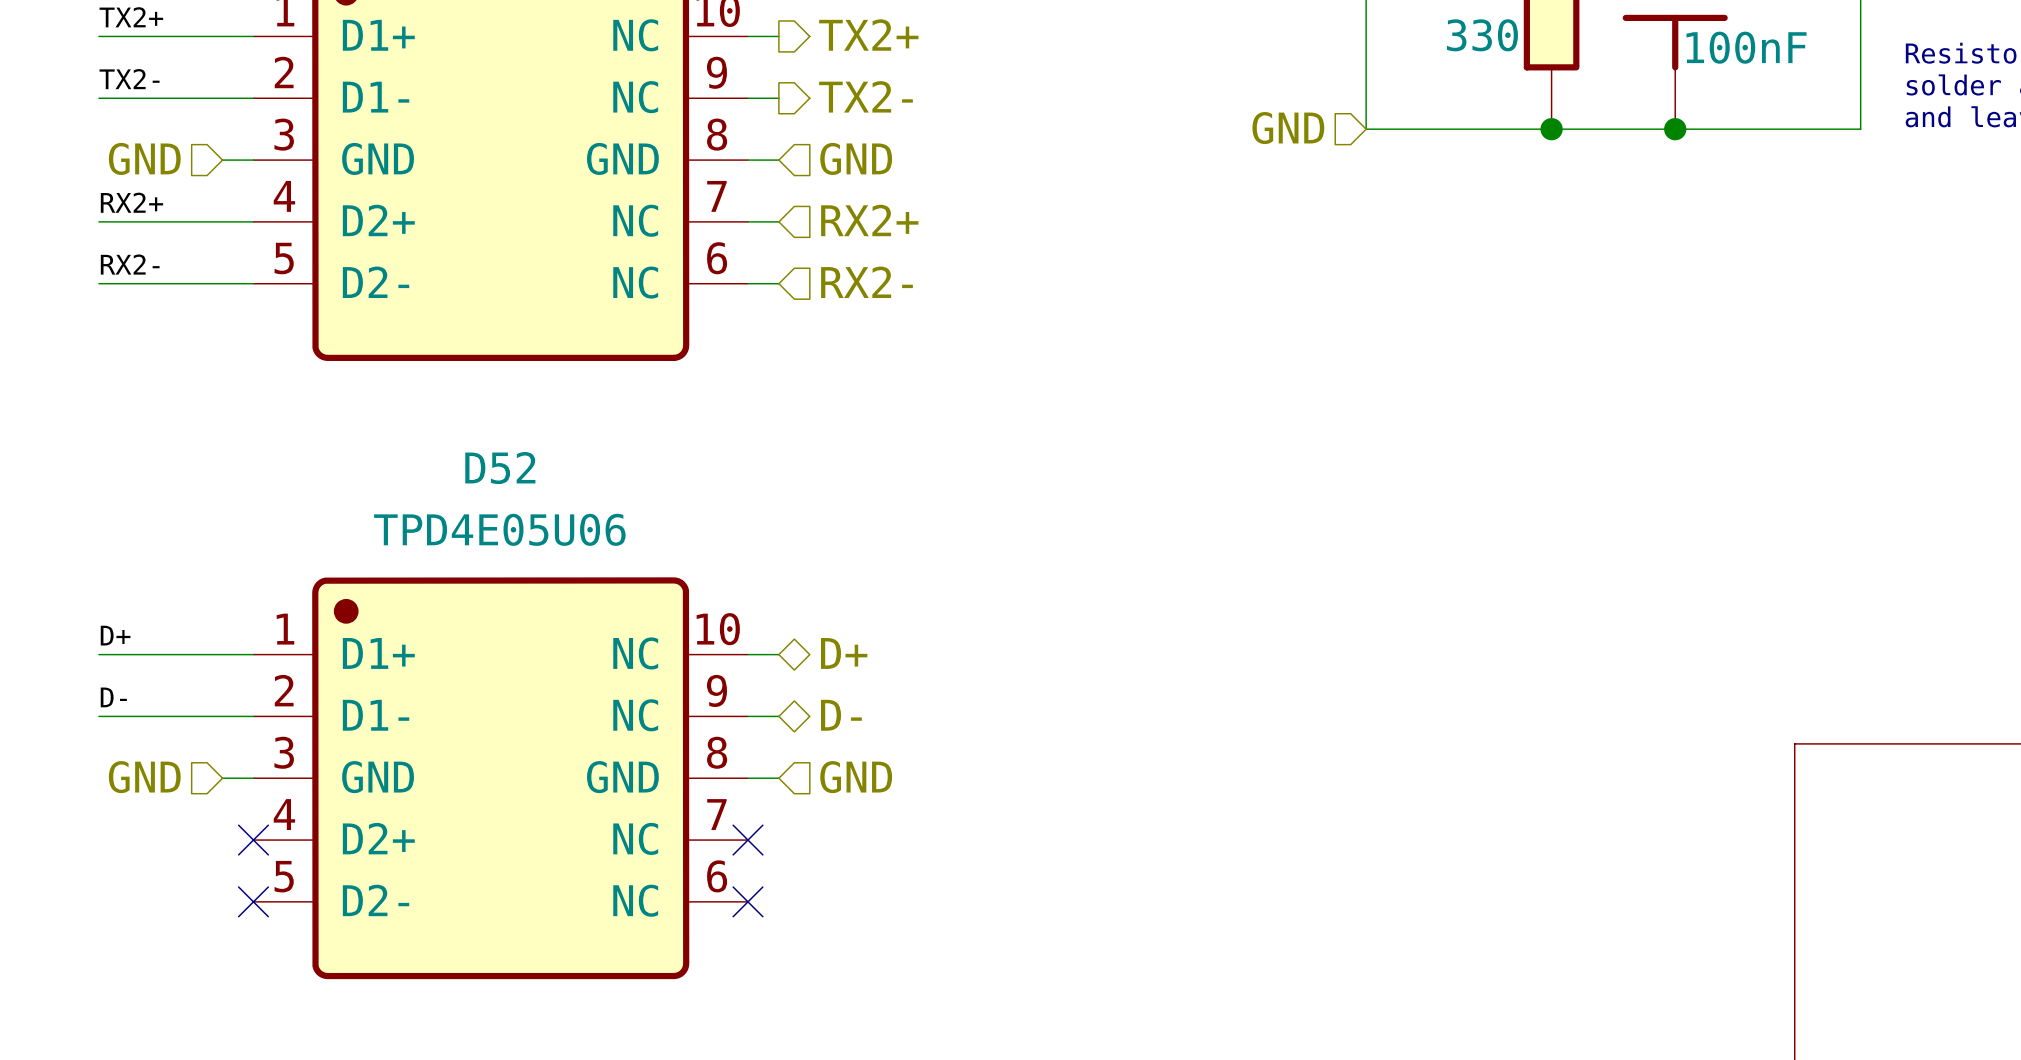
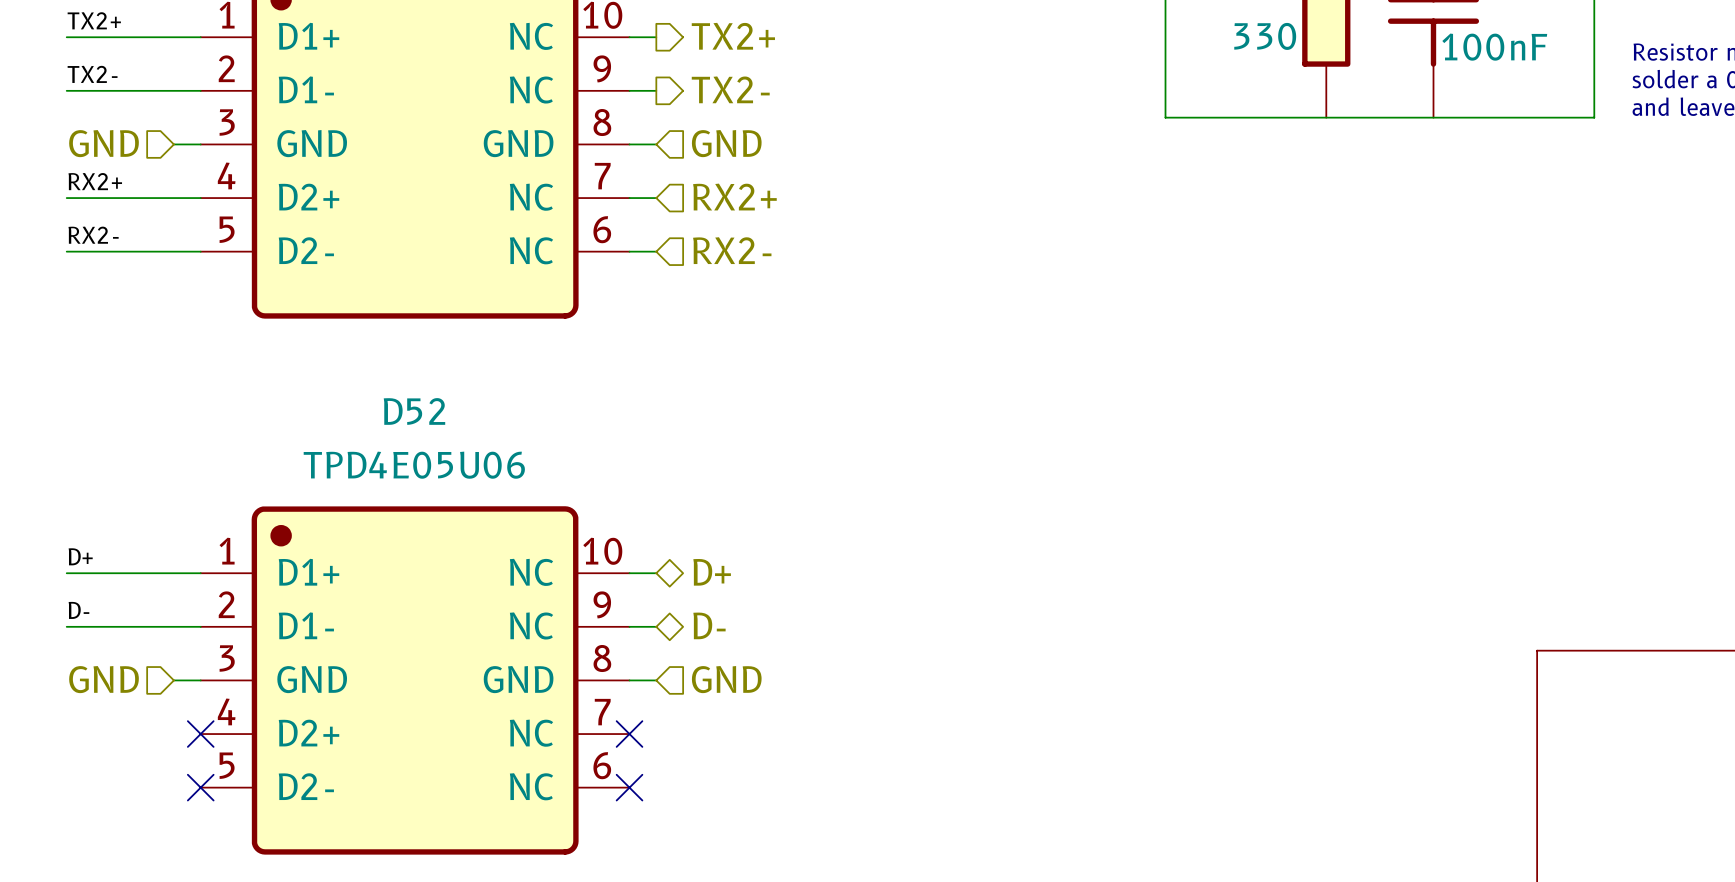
hierarchical label: GND (1288, 128) -> none
junction: (1551, 129) -> none
junction: (1675, 129) -> none

